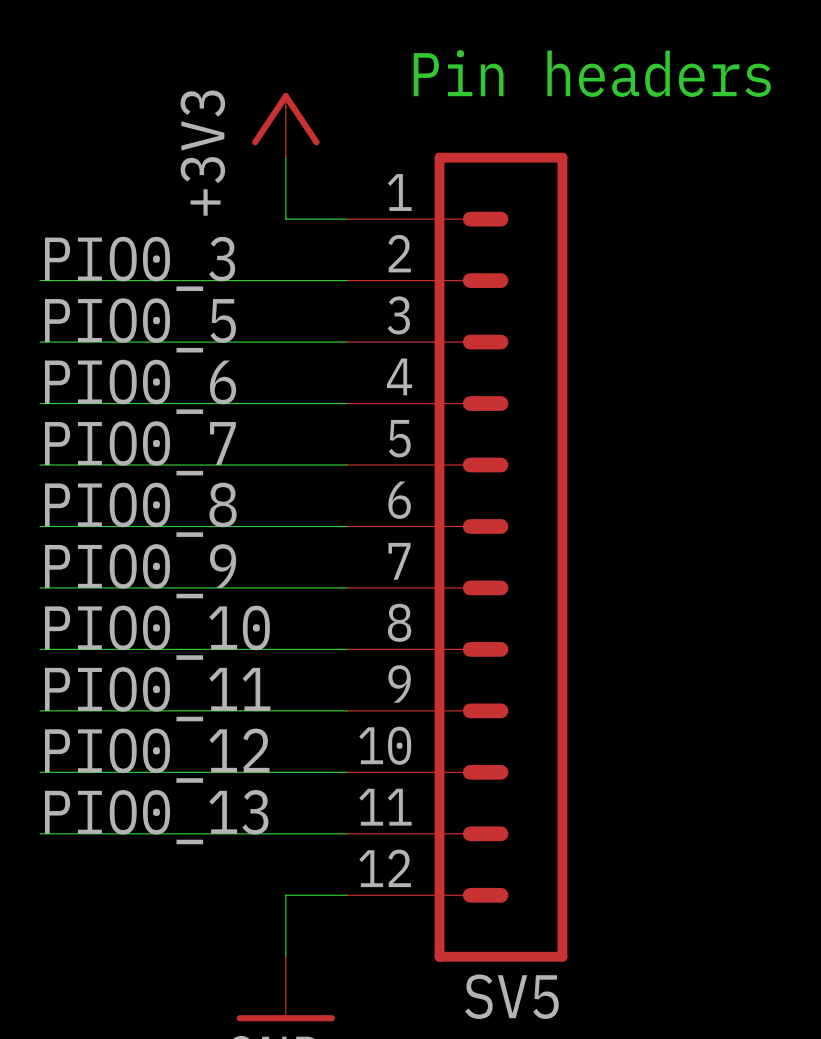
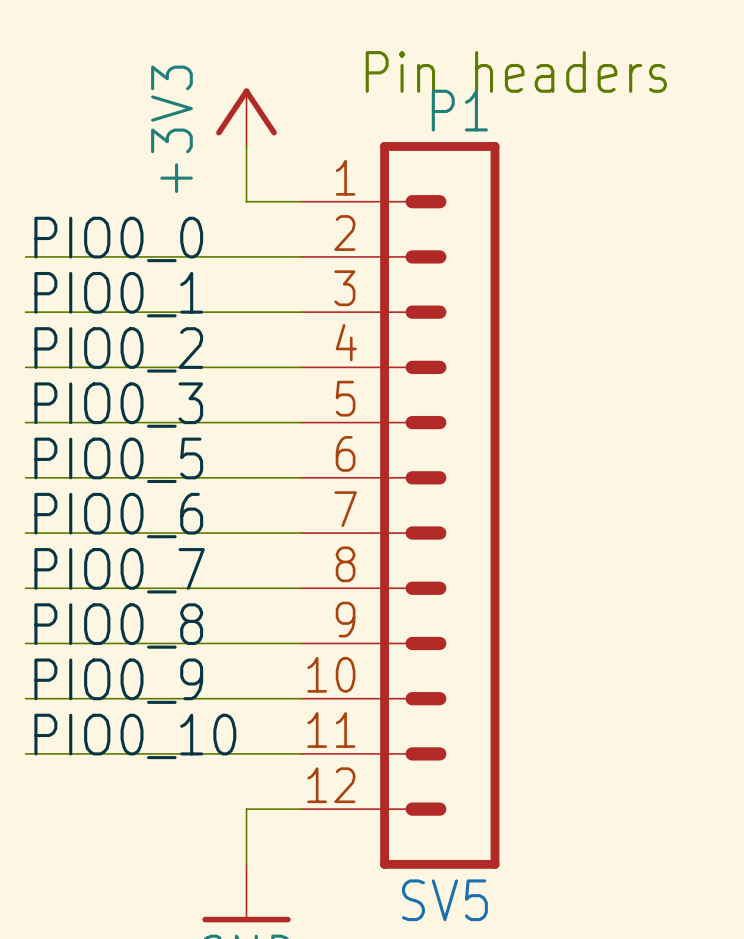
SV5 value: none -> P1 (459, 110)
label: PIO0_3 (140, 263) -> PIO0_0 (118, 239)
label: PIO0_5 (140, 325) -> PIO0_1 (118, 294)
label: PIO0_6 (140, 386) -> PIO0_2 (118, 349)
label: PIO0_7 (140, 448) -> PIO0_3 (118, 405)
label: PIO0_8 (140, 509) -> PIO0_5 (118, 460)
label: PIO0_9 (140, 571) -> PIO0_6 (118, 515)
label: PIO0_10 (157, 632) -> PIO0_7 (119, 570)
label: PIO0_11 (157, 694) -> PIO0_8 (118, 625)
label: PIO0_12 (157, 755) -> PIO0_9 (118, 681)
label: PIO0_13 (156, 817) -> PIO0_10 (135, 736)

